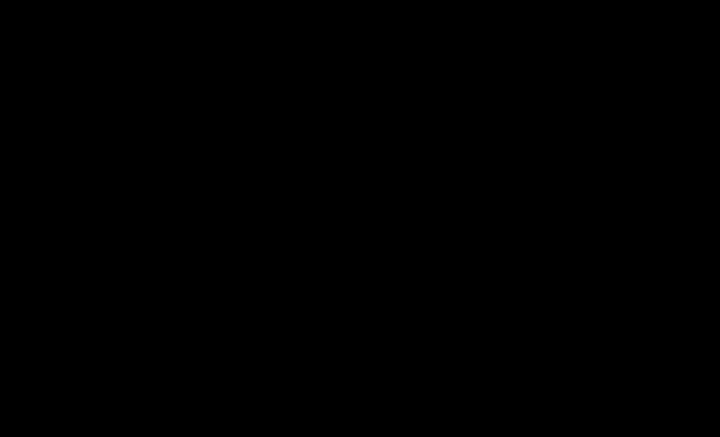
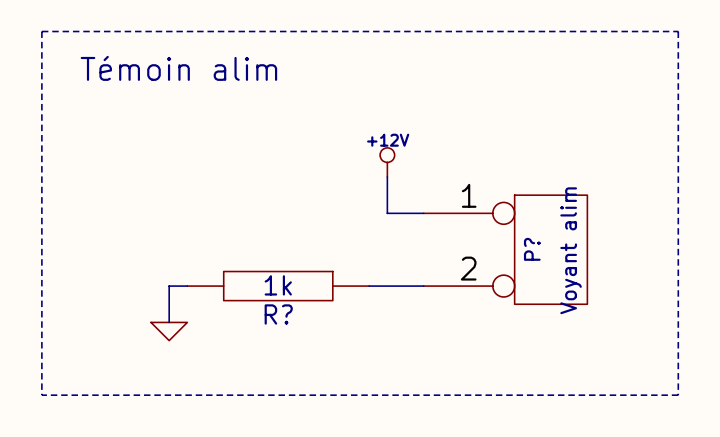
line: none -> (41, 31) (41, 395) (678, 395) (678, 31) (41, 31)
text: none -> Témoin alim (178, 68)
power symbol: none -> +12V (387, 162)
wire: none -> (387, 176) (387, 213) (423, 213)
P?: none -> Voyant alim (505, 249)
wire: none -> (187, 286) (169, 286) (169, 322)
R?: none -> 1k (278, 286)
wire: none -> (369, 286) (423, 286)
power symbol: none -> (169, 331)

